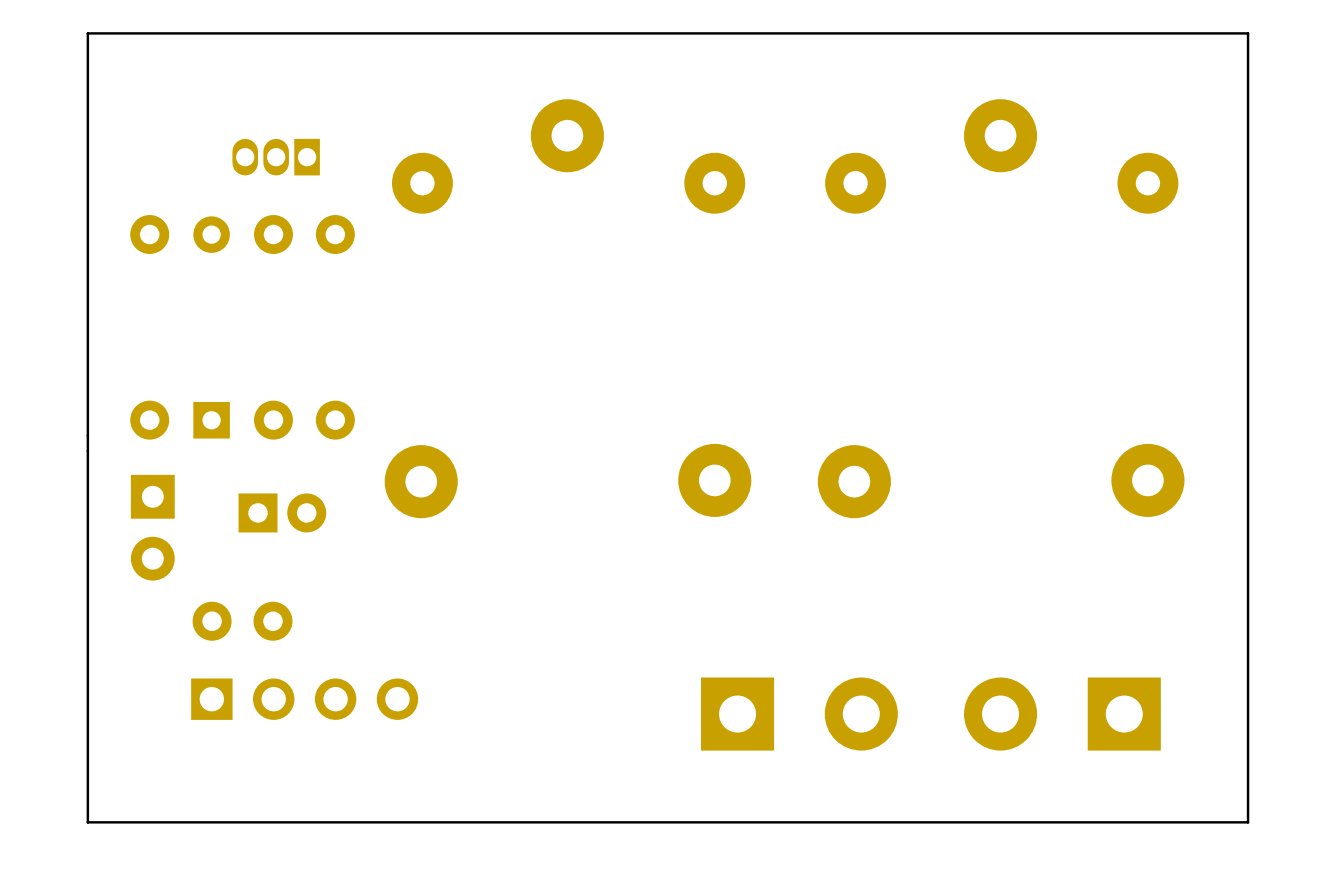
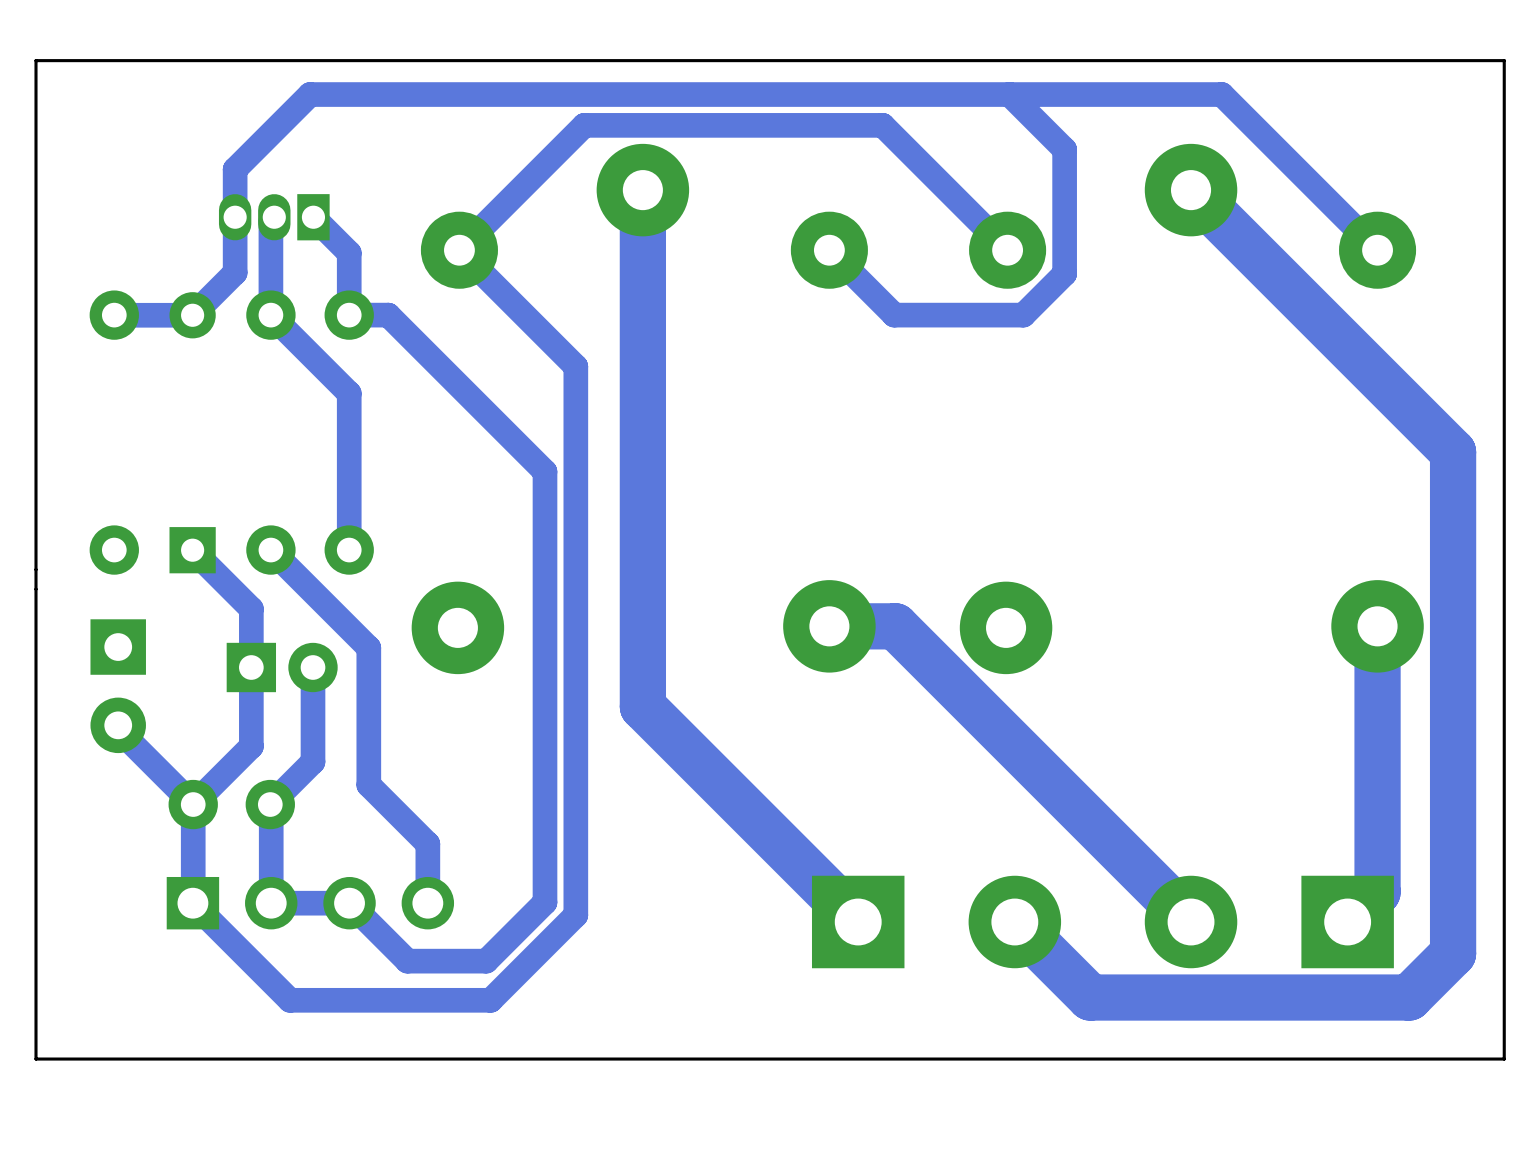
track: none -> (1009, 94) (1064, 149) (1064, 273) (1023, 315) (894, 315) (829, 250)
track: none -> (642, 190) (642, 706) (858, 922)
track: none -> (1191, 190) (1453, 452) (1453, 953) (1409, 997) (1090, 997) (1014, 922)
track: none -> (274, 217) (270, 220) (270, 315) (349, 393) (349, 550)
track: none -> (313, 217) (349, 253) (349, 315) (388, 315) (544, 471) (544, 902) (486, 961) (407, 961) (349, 903) (271, 903) (270, 804) (313, 761) (313, 667)
track: none -> (1007, 250) (882, 125) (584, 125) (459, 250) (575, 366) (575, 915) (490, 1000) (290, 1000) (192, 903)
track: none -> (1377, 250) (1221, 94) (310, 94) (235, 169) (235, 272) (192, 315) (114, 315)
track: none -> (192, 550) (251, 608) (251, 746) (193, 804)
track: none -> (270, 550) (368, 647) (368, 784) (427, 844) (427, 903)
track: none -> (829, 626) (895, 626) (1191, 922)
track: none -> (1377, 626) (1377, 892) (1347, 922)
track: none -> (118, 725) (118, 729) (193, 804)
track: none -> (193, 804) (192, 902)

